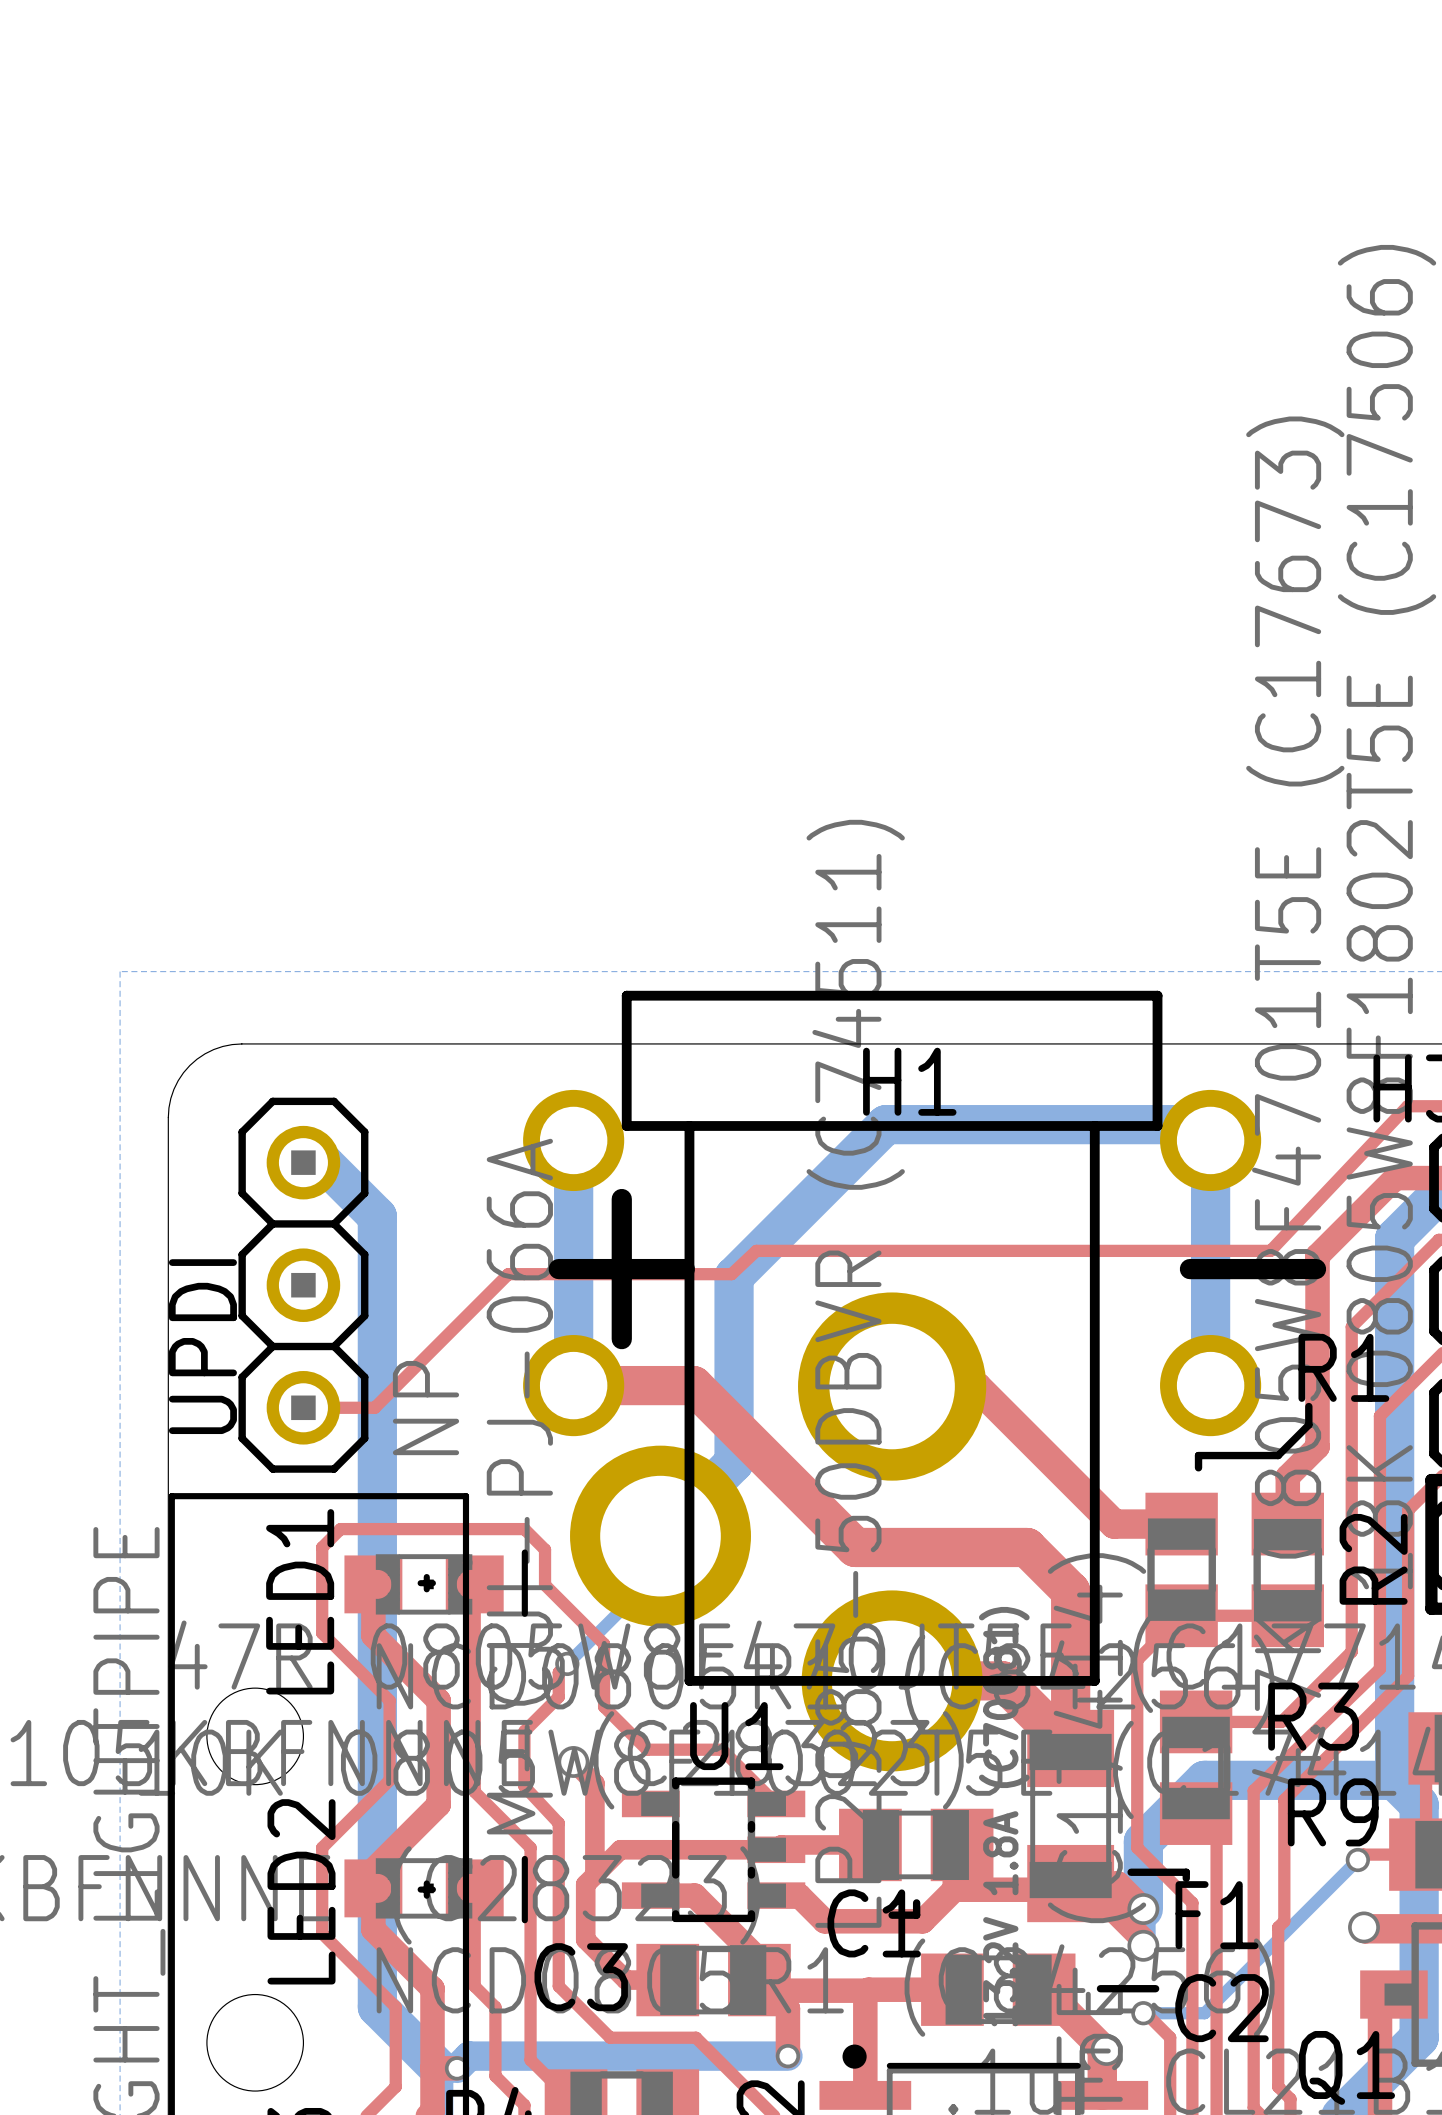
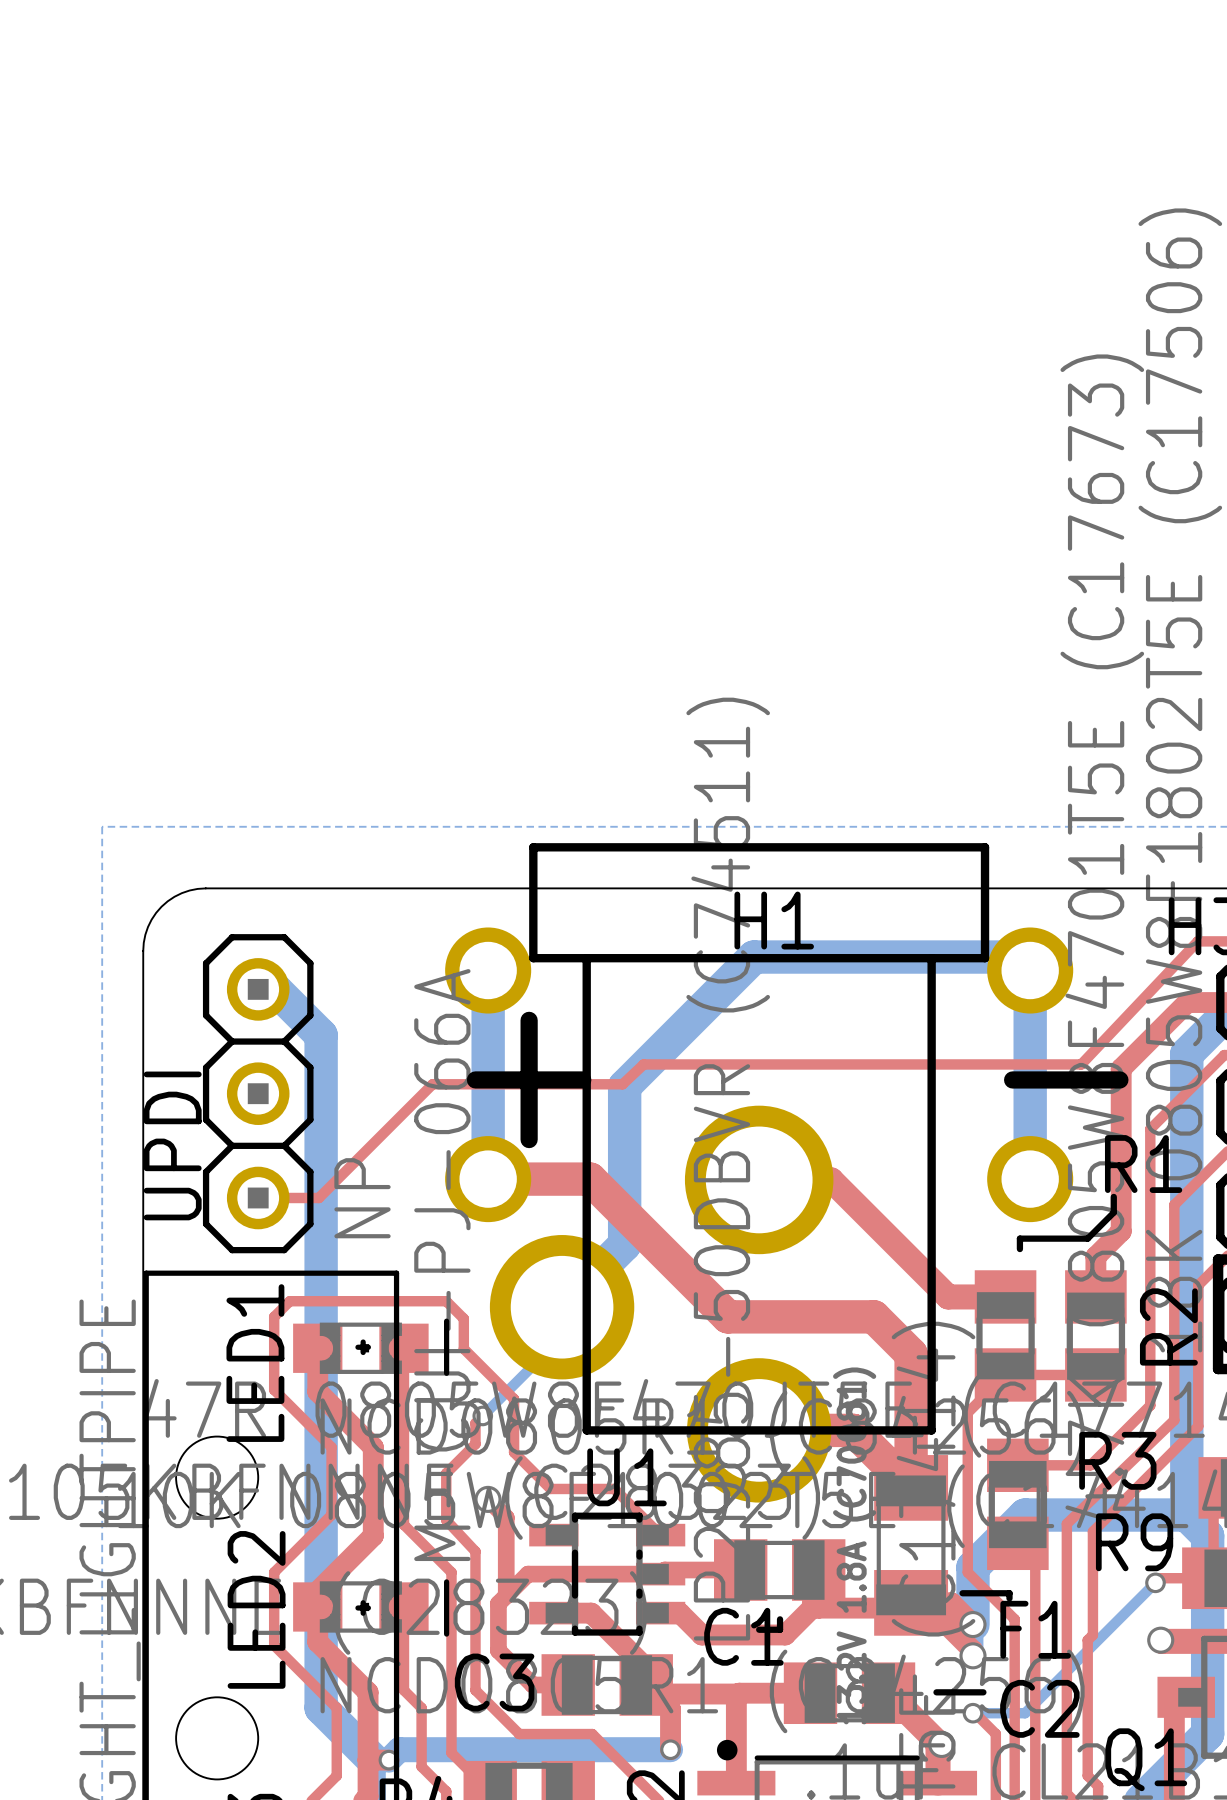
H1 footprint: [570, 990, 1163, 1772] -> [489, 843, 990, 1503]

